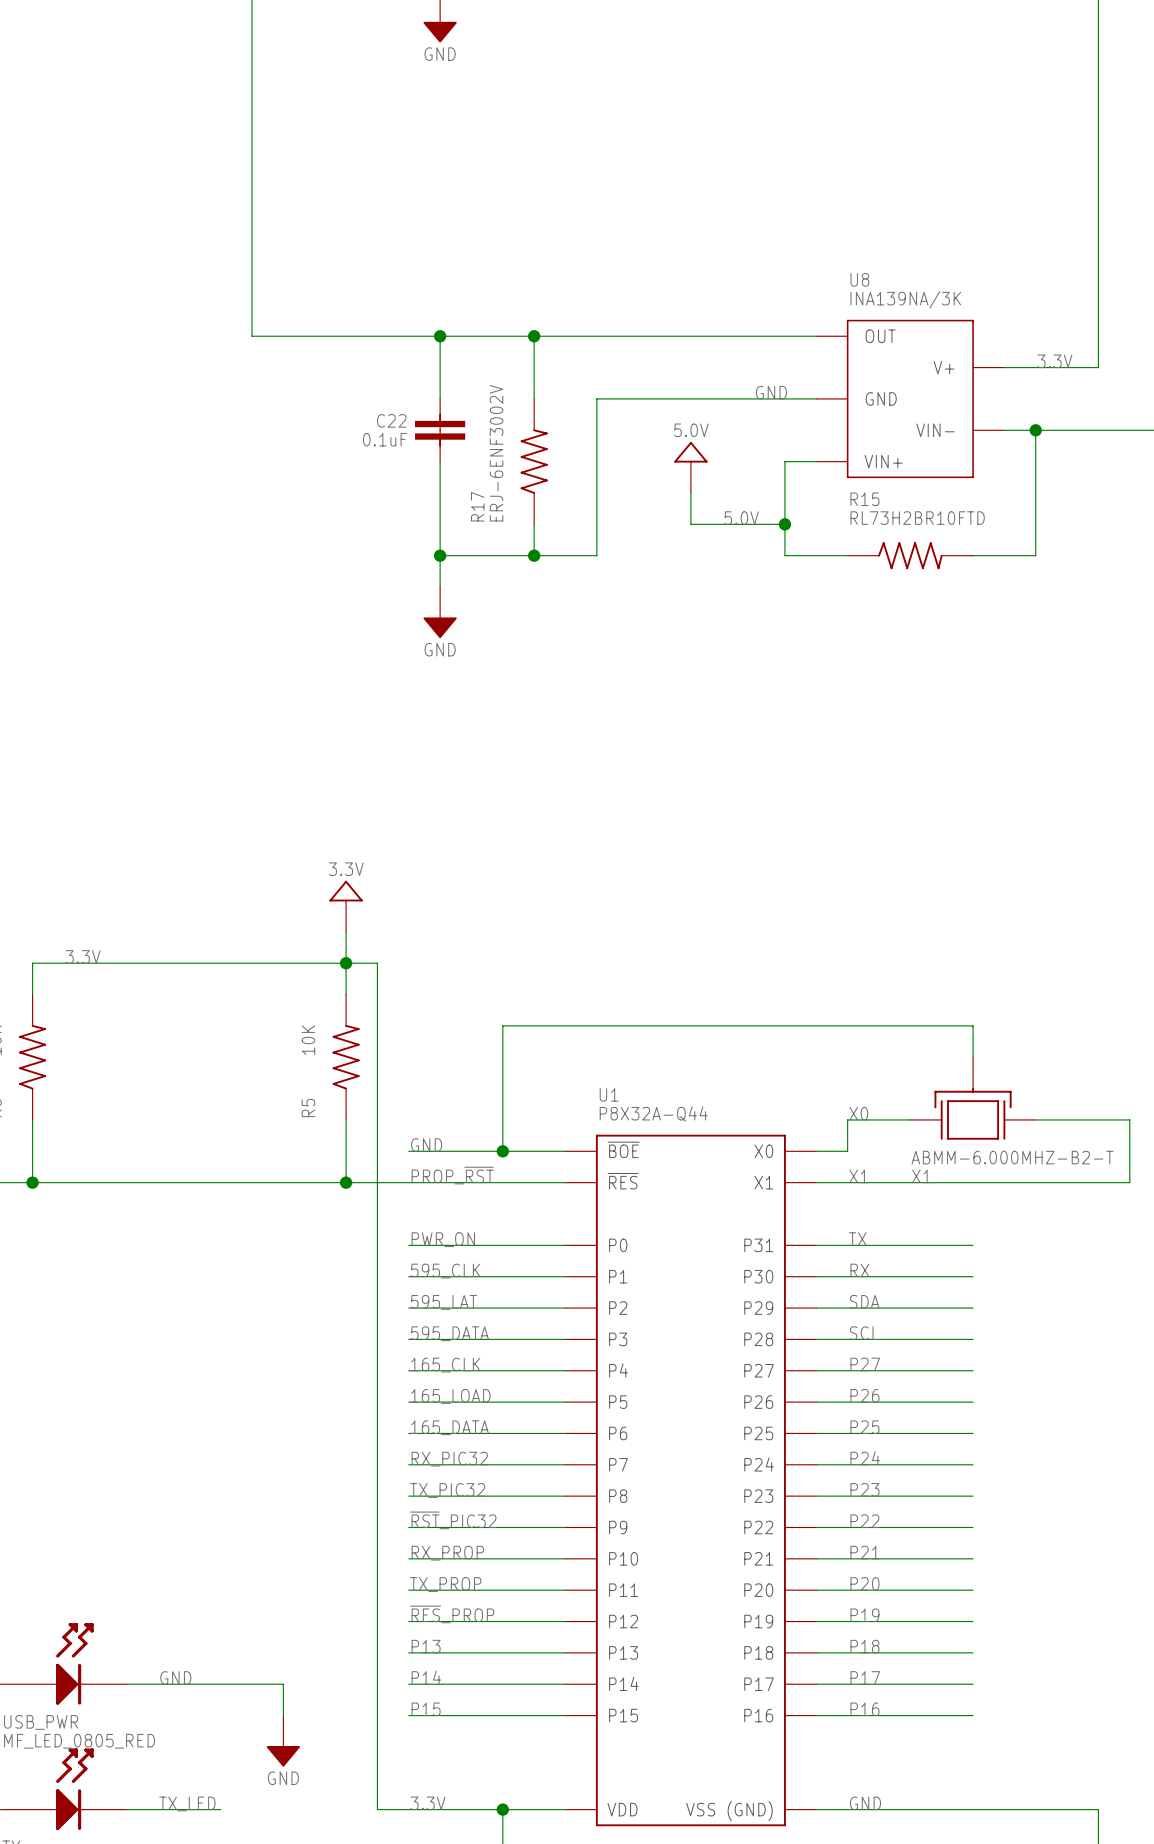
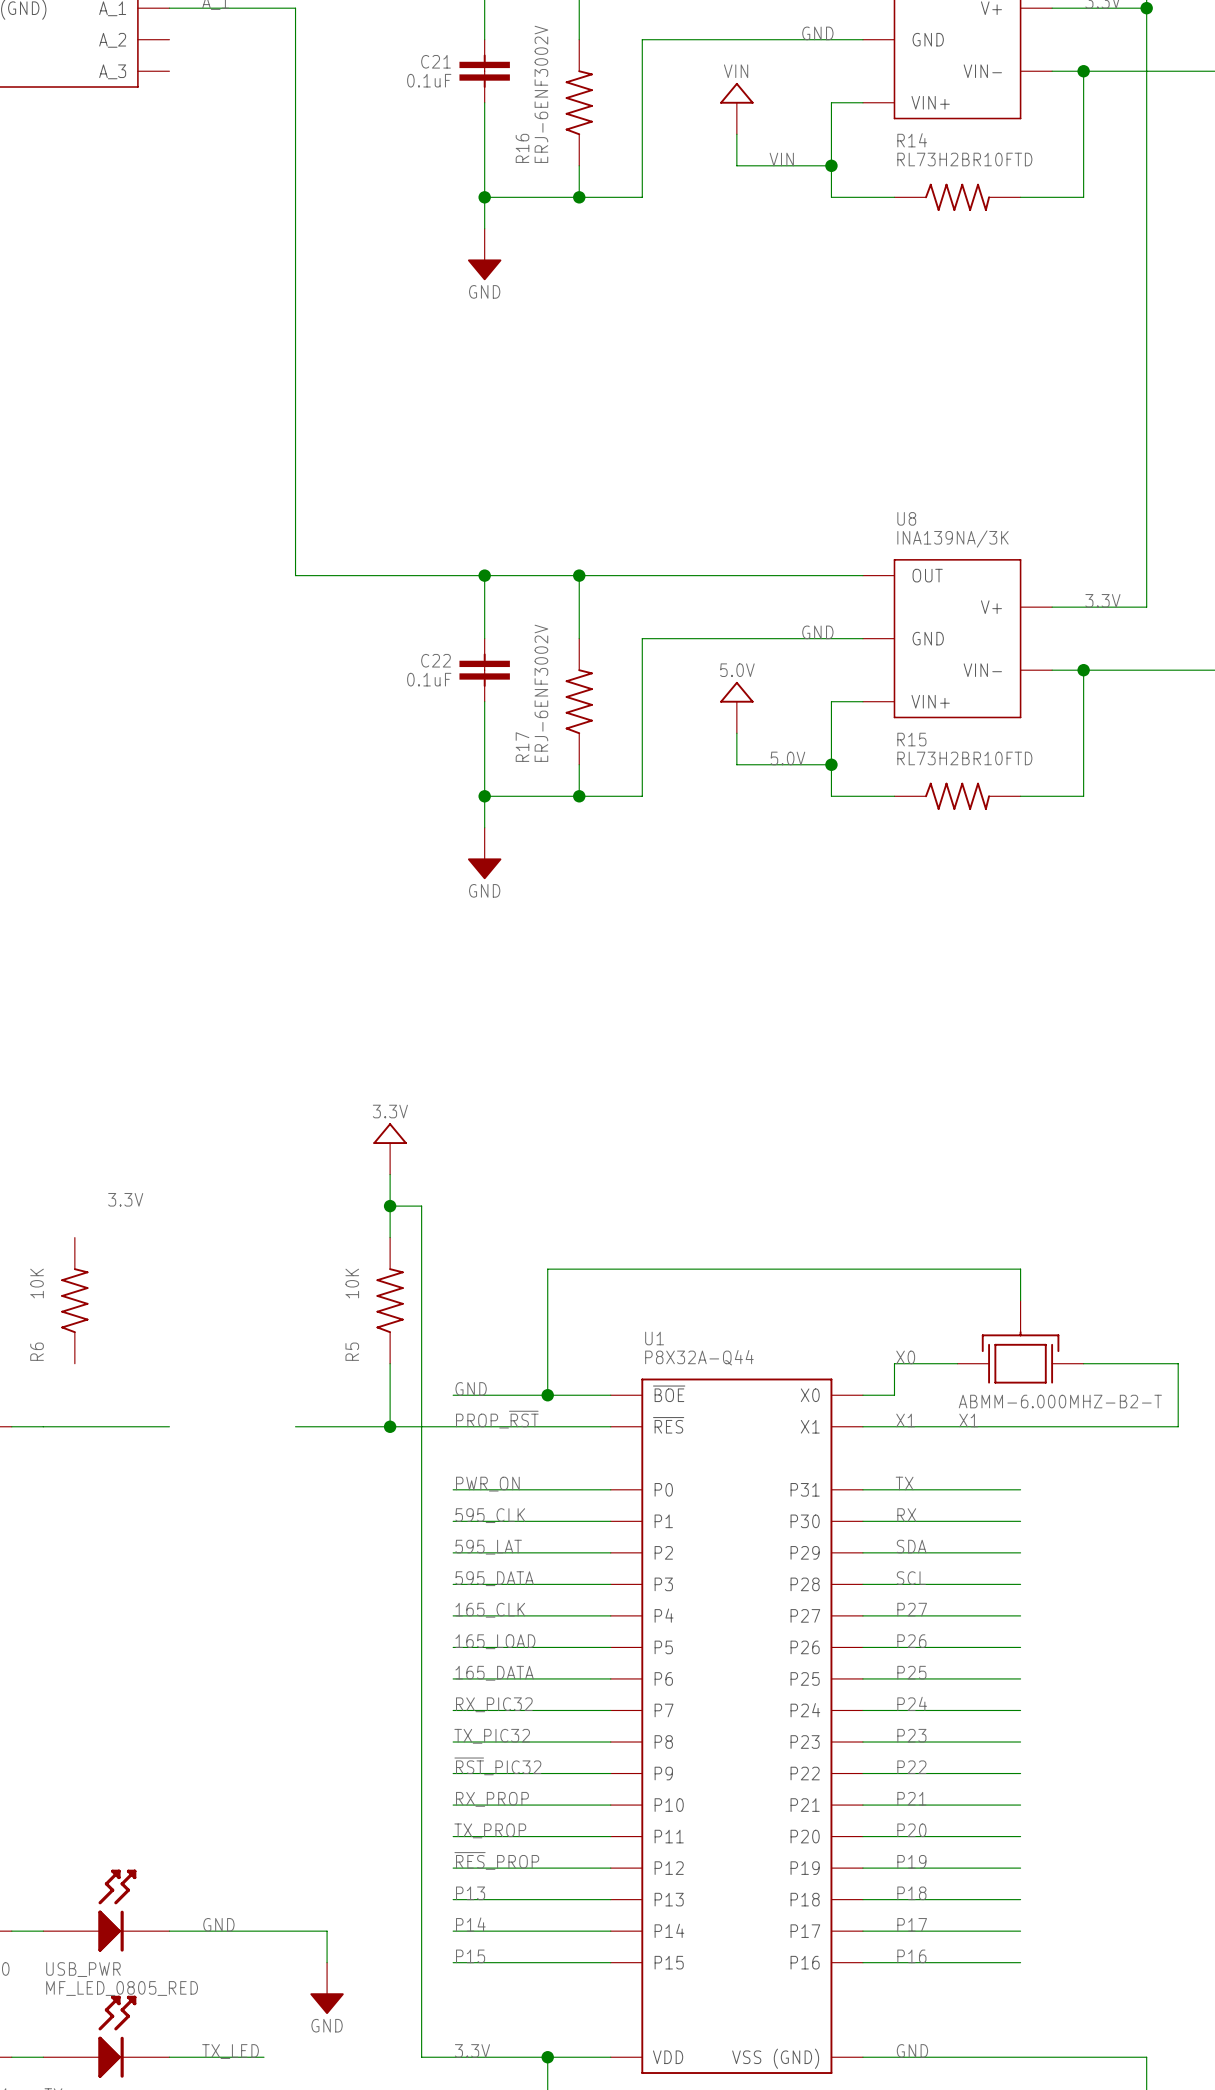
wire: (346, 963) (32, 963) (32, 994) -> none
wire: (32, 1119) (32, 1182) -> none
junction: (32, 1182) -> none
wire: (126, 1182) (252, 1182) -> none

